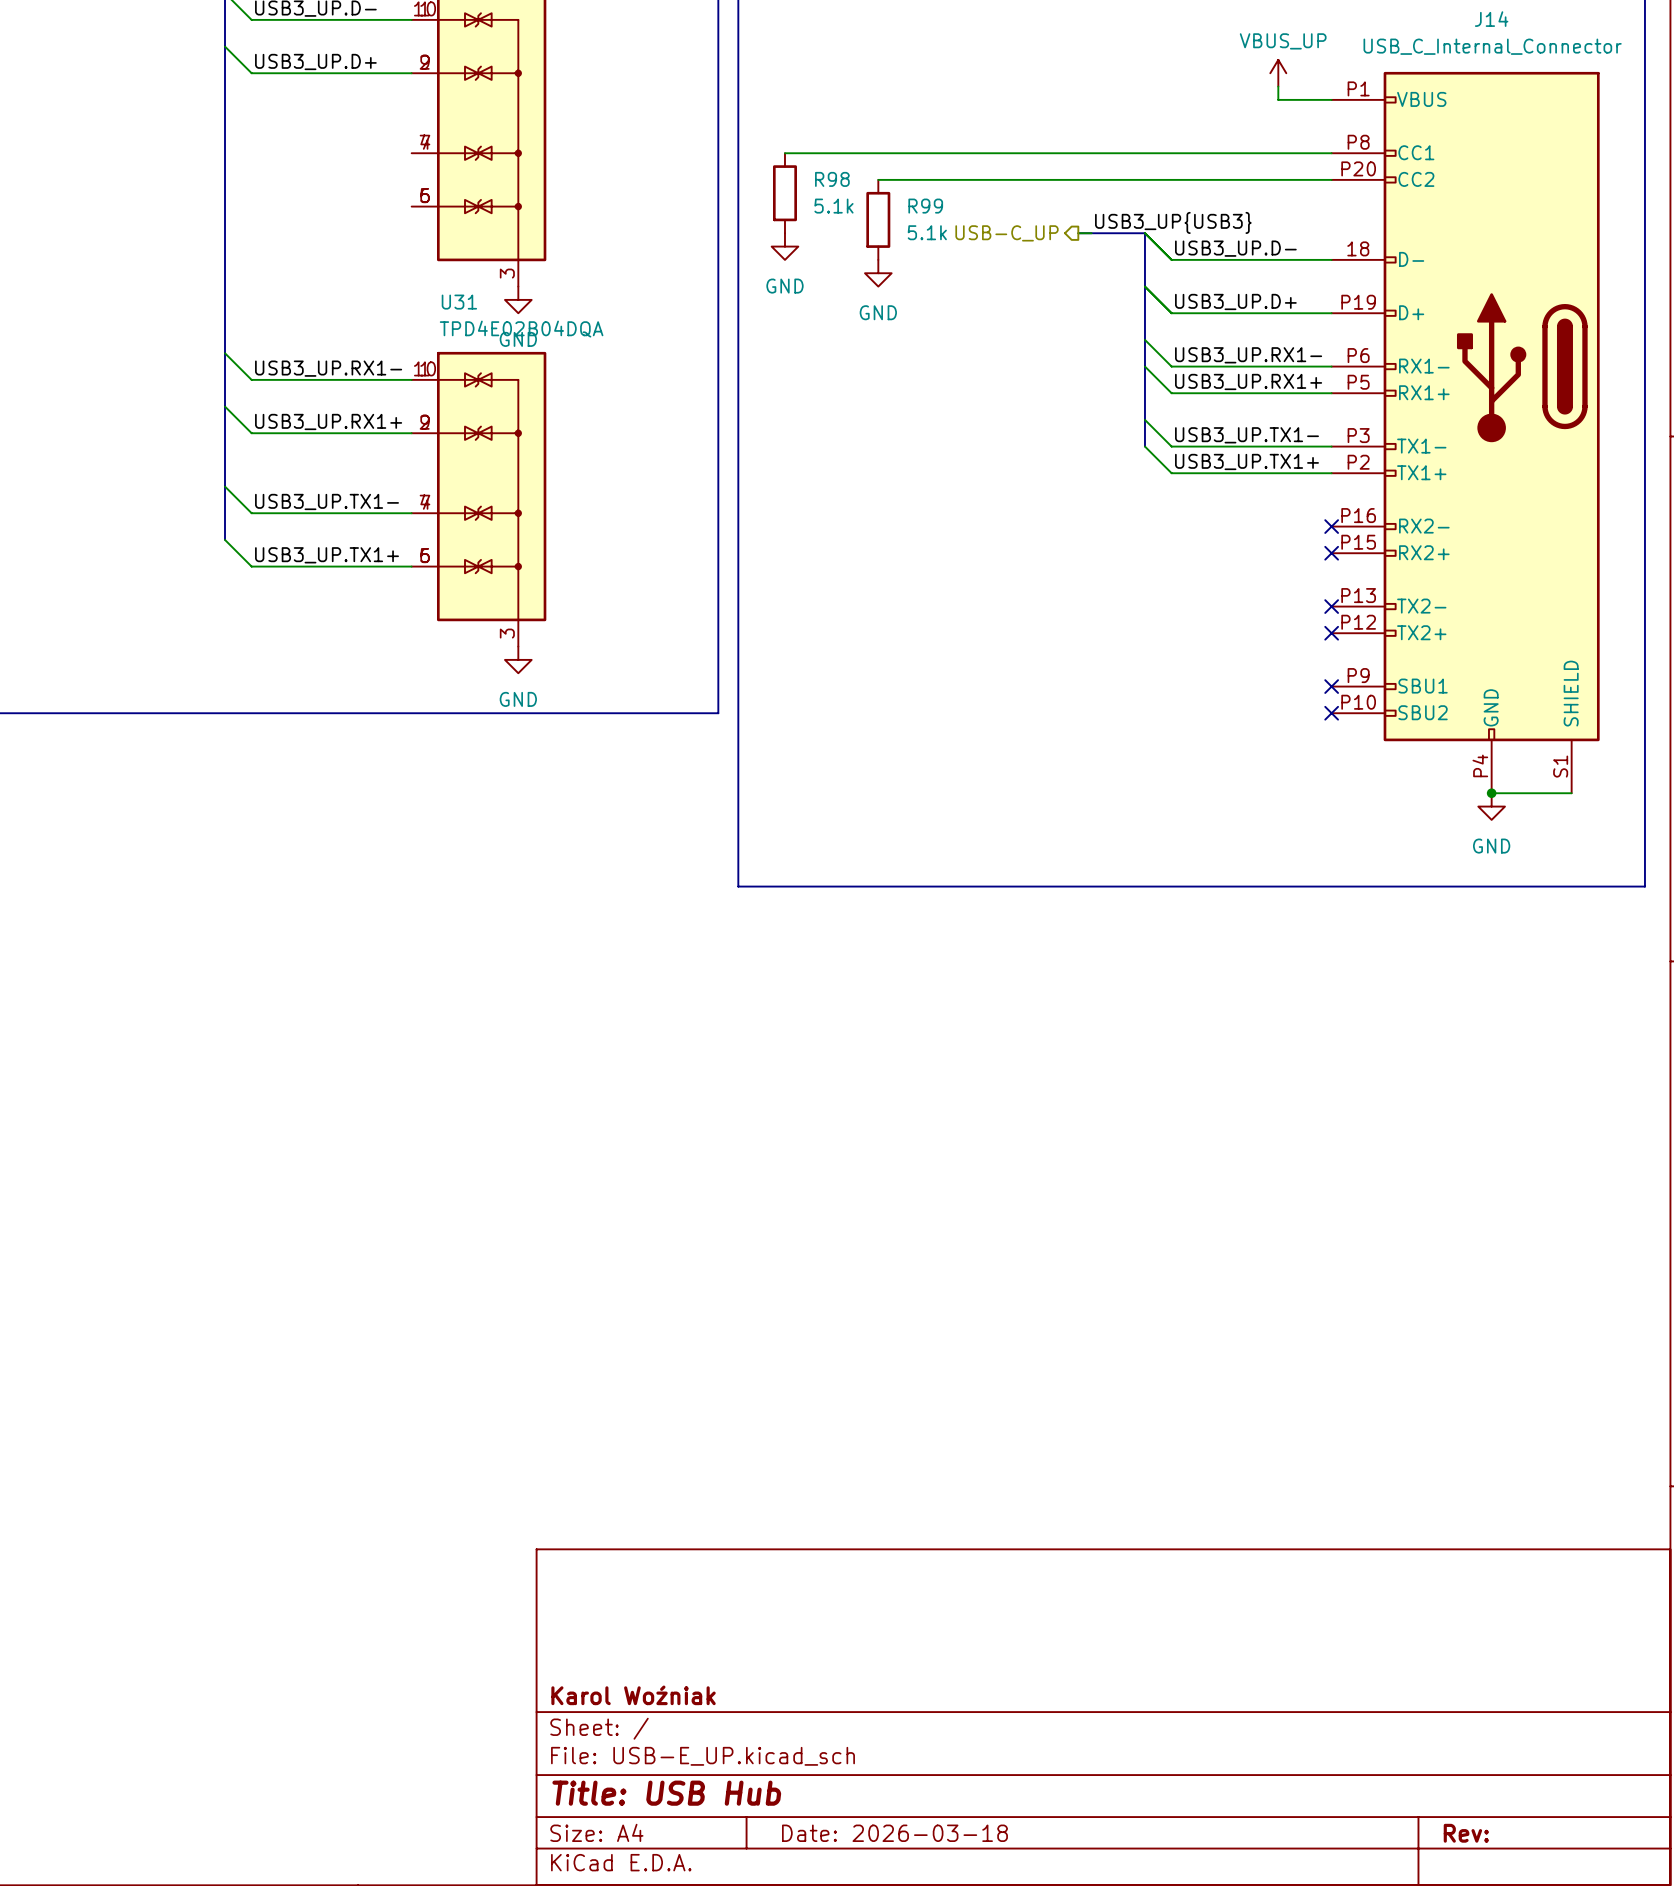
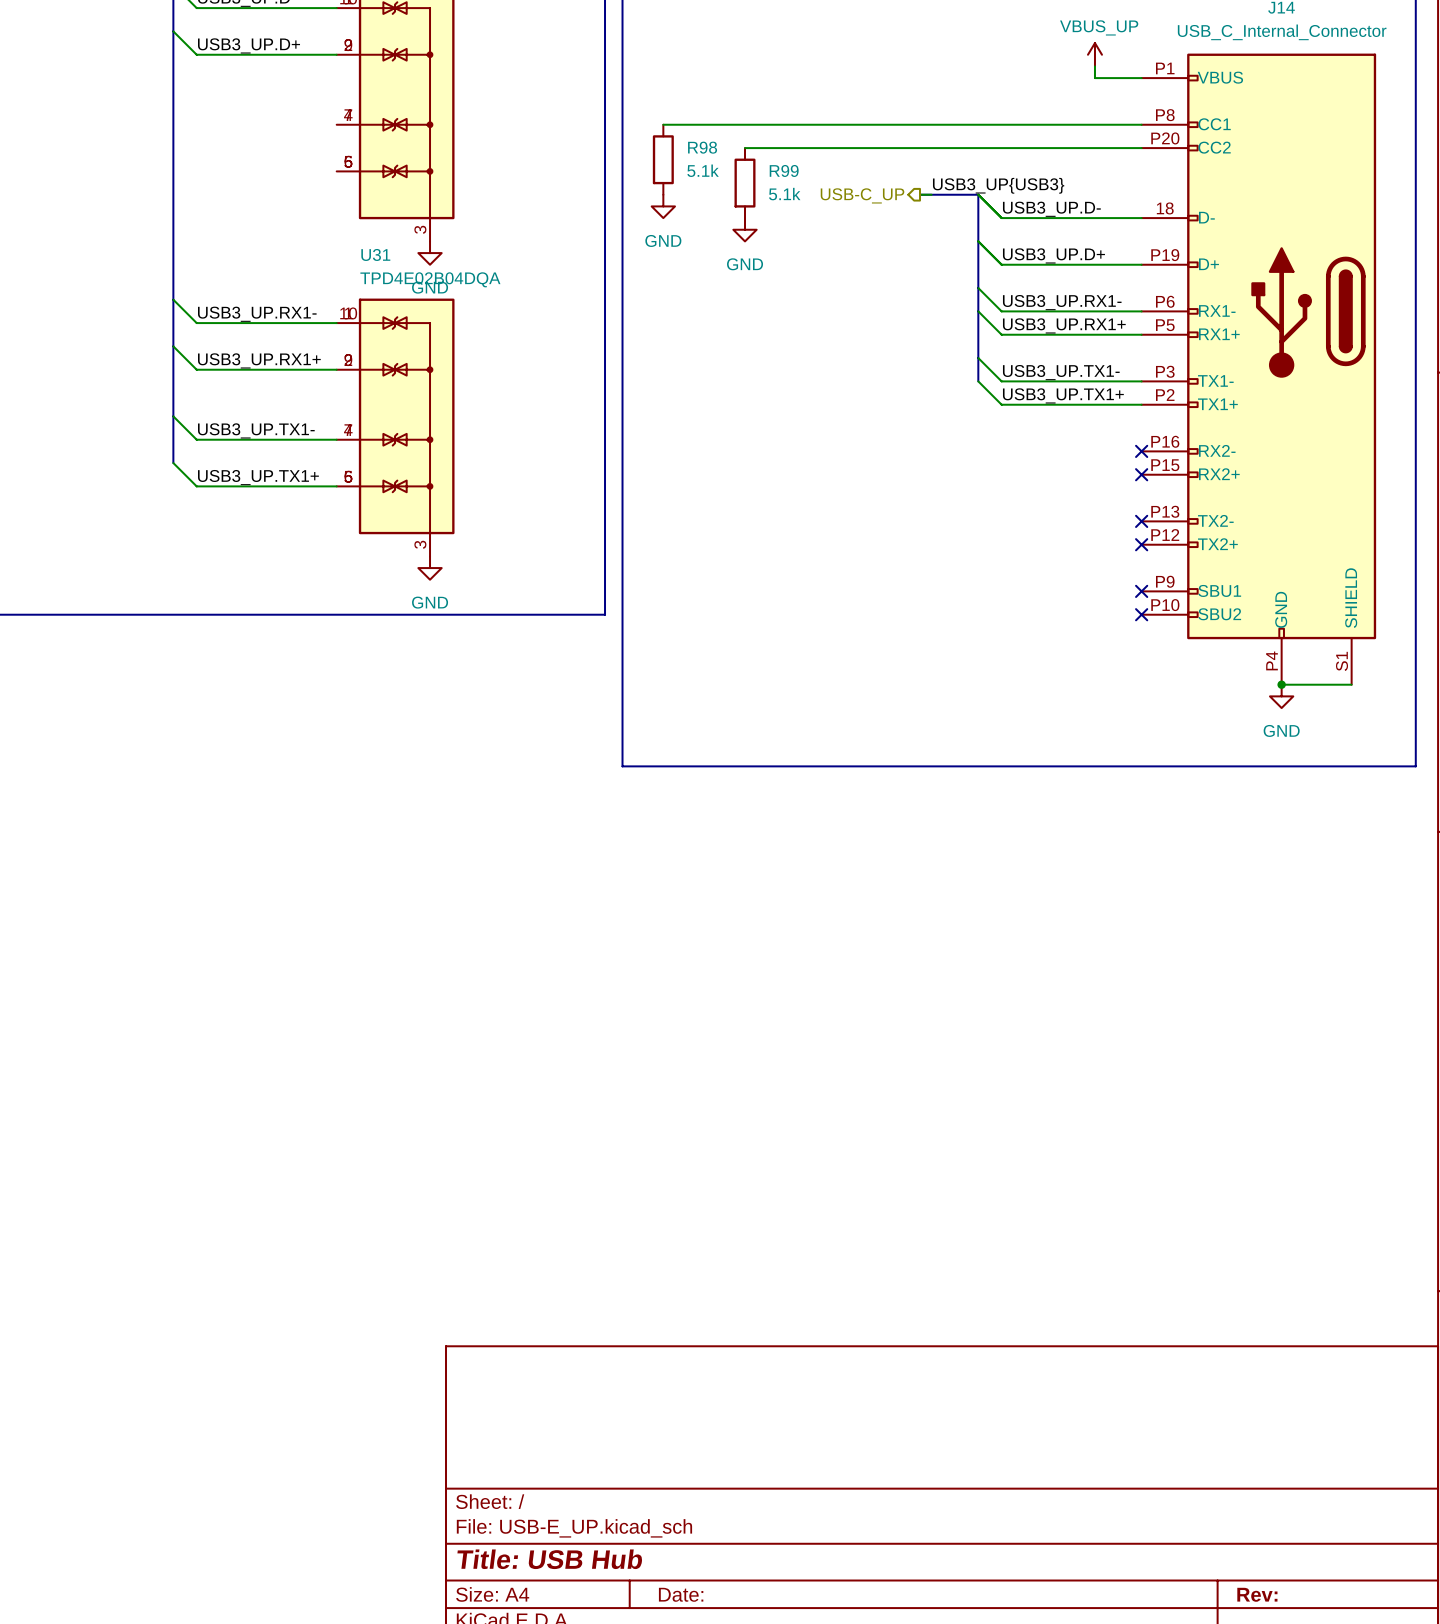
title block: Karol Woźniak (633, 1695) -> none
title block: Date: 2026-03-18 (894, 1833) -> Date: (681, 1594)

